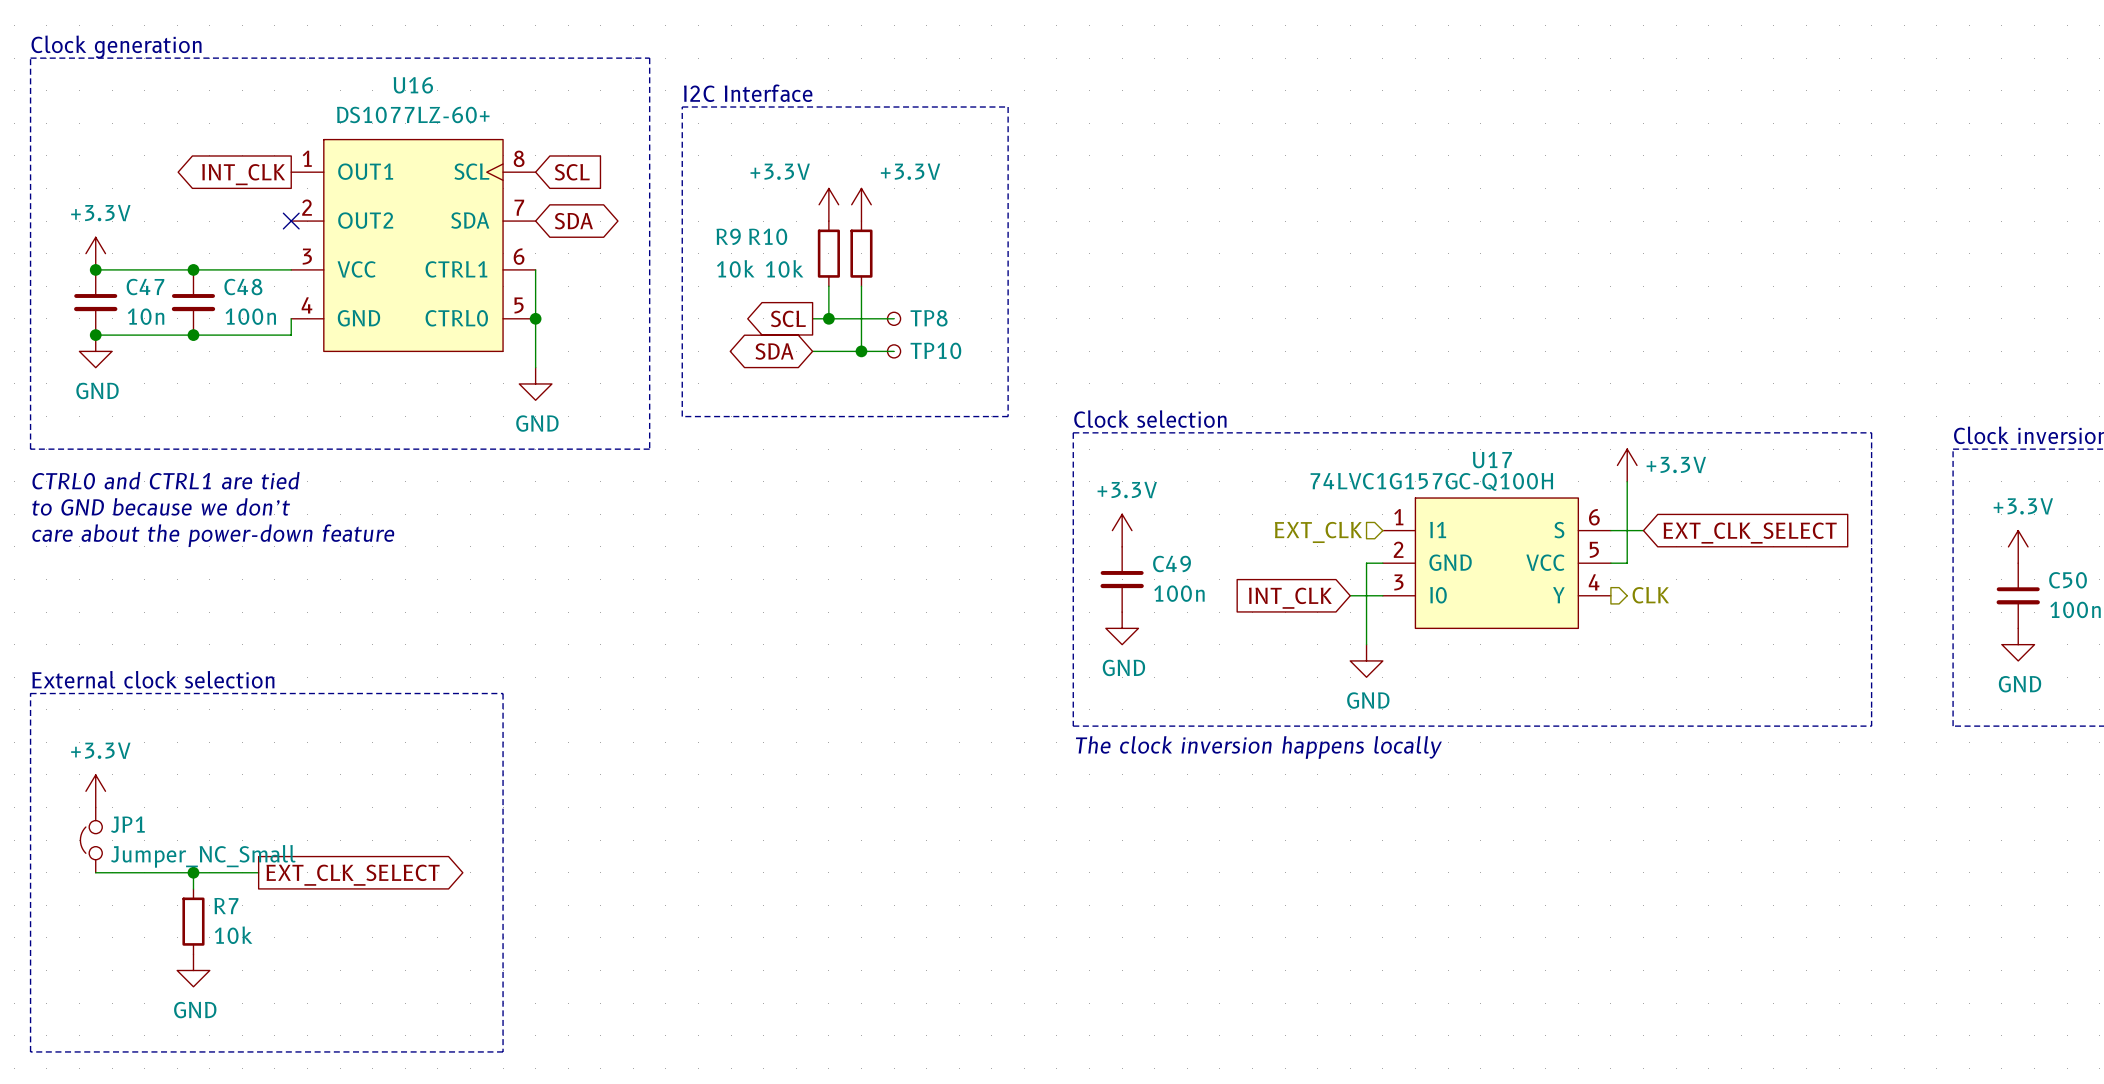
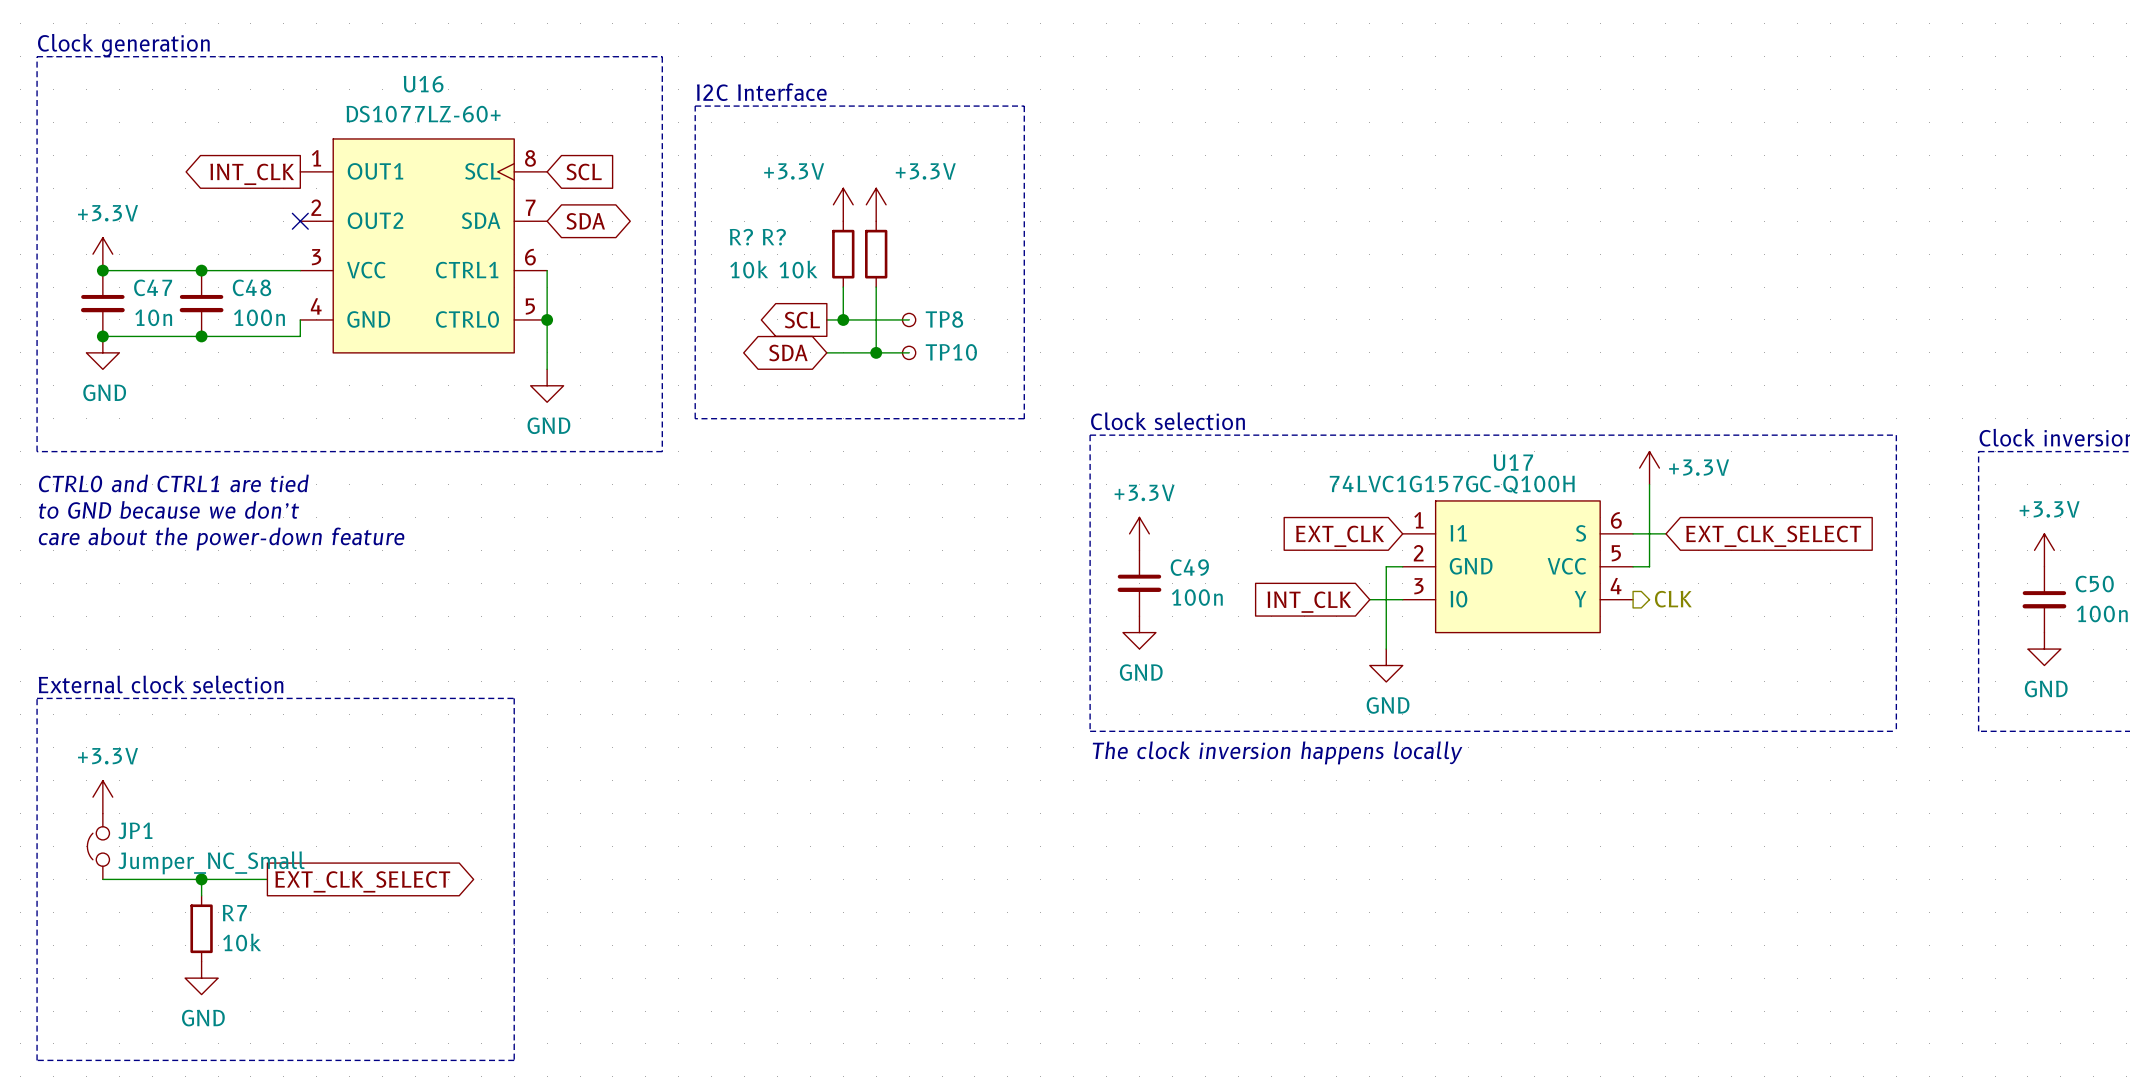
R9 name: R9 (728, 236) -> R? (741, 237)
R10 name: R10 (768, 236) -> R? (774, 237)
hierarchical label: EXT_CLK (1318, 532) -> none
global label: none -> EXT_CLK (1340, 536)

